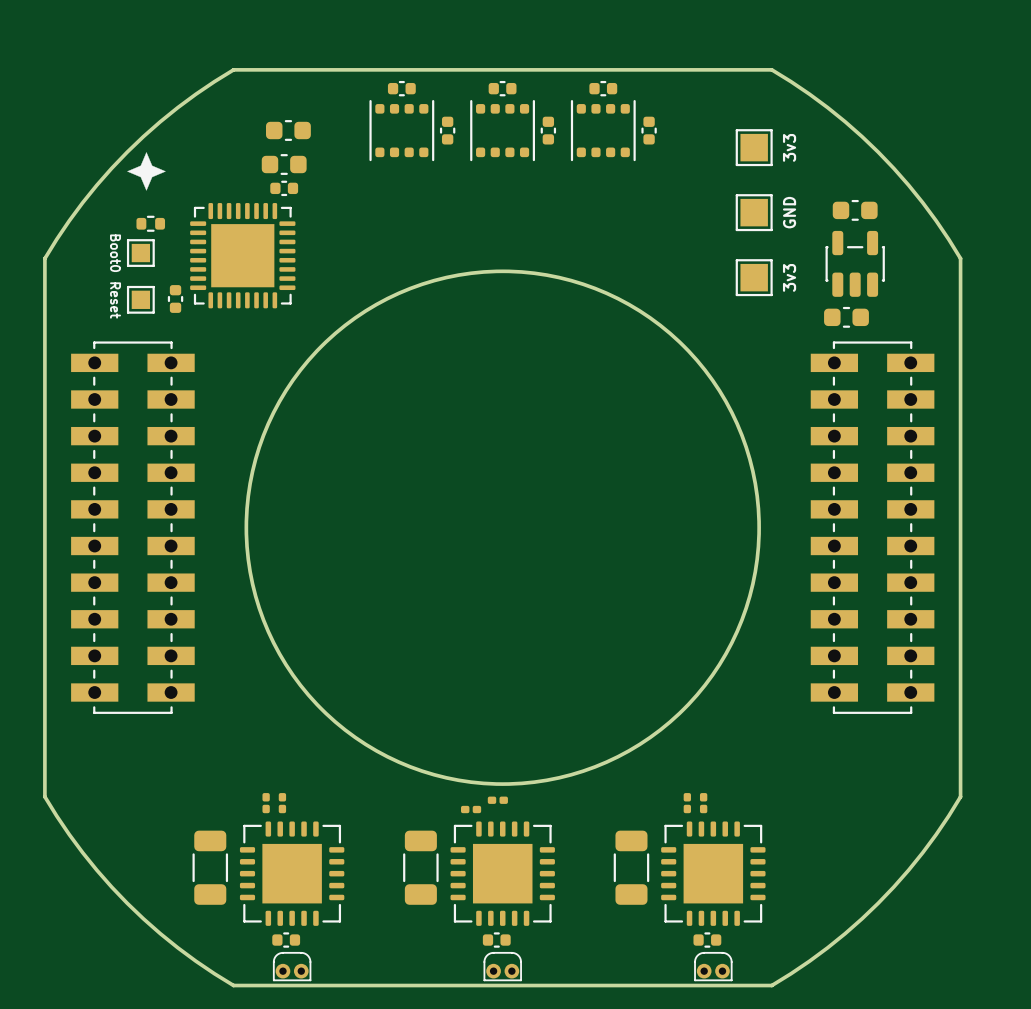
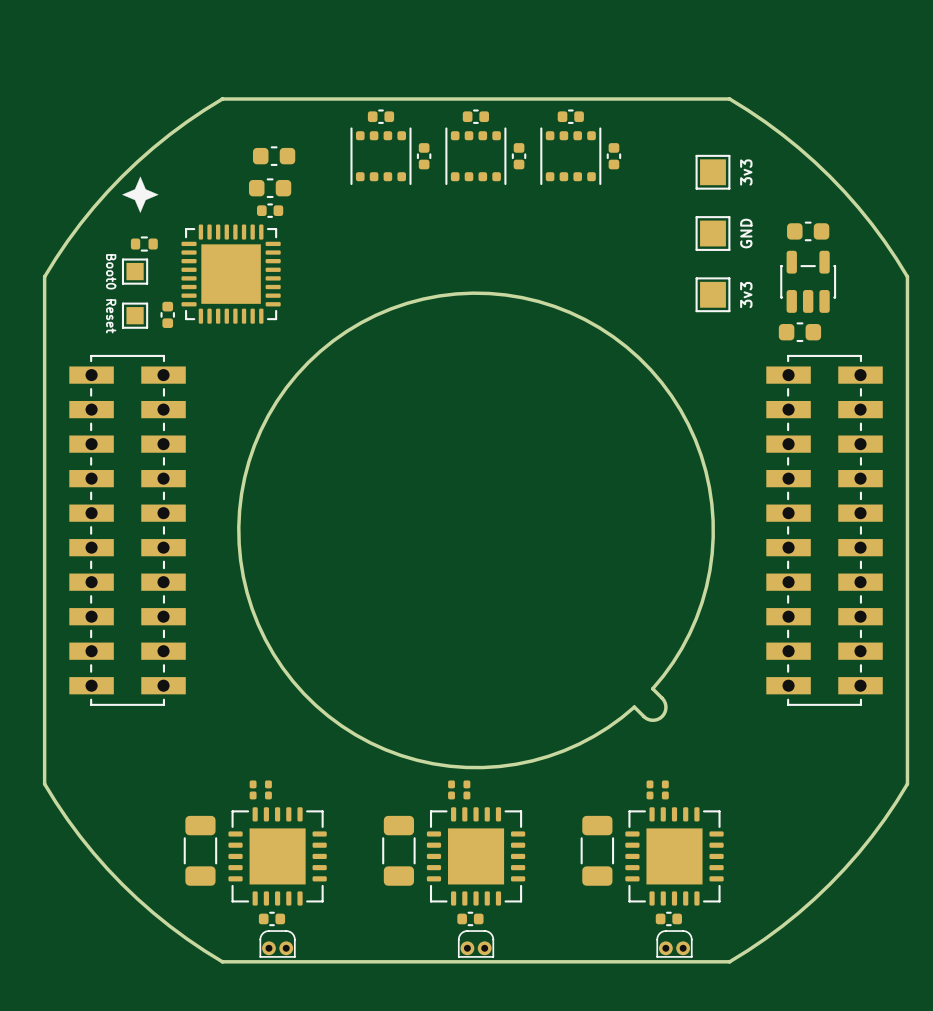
round board edge: [244, 269, 761, 786] -> none
board edge: none -> (652, 688) (663, 699) (665, 705) (664, 712) (658, 719) (647, 719) (634, 707) (608, 727) (564, 750) (532, 760) (482, 767) (433, 763) (385, 749) (355, 734) (315, 705) (292, 681) (265, 639) (247, 593) (239, 543) (241, 494) (248, 461) (268, 415) (296, 374) (333, 340) (361, 322) (407, 303) (456, 293) (489, 293) (538, 301) (585, 319) (626, 347) (661, 382) (688, 424) (705, 471) (713, 520) (709, 570) (702, 602) (681, 648) (652, 688)
part rotation: 0° (497, 800) -> 90° clockwise (466, 789)
part rotation: 0° (471, 809) -> 90° clockwise (451, 789)

